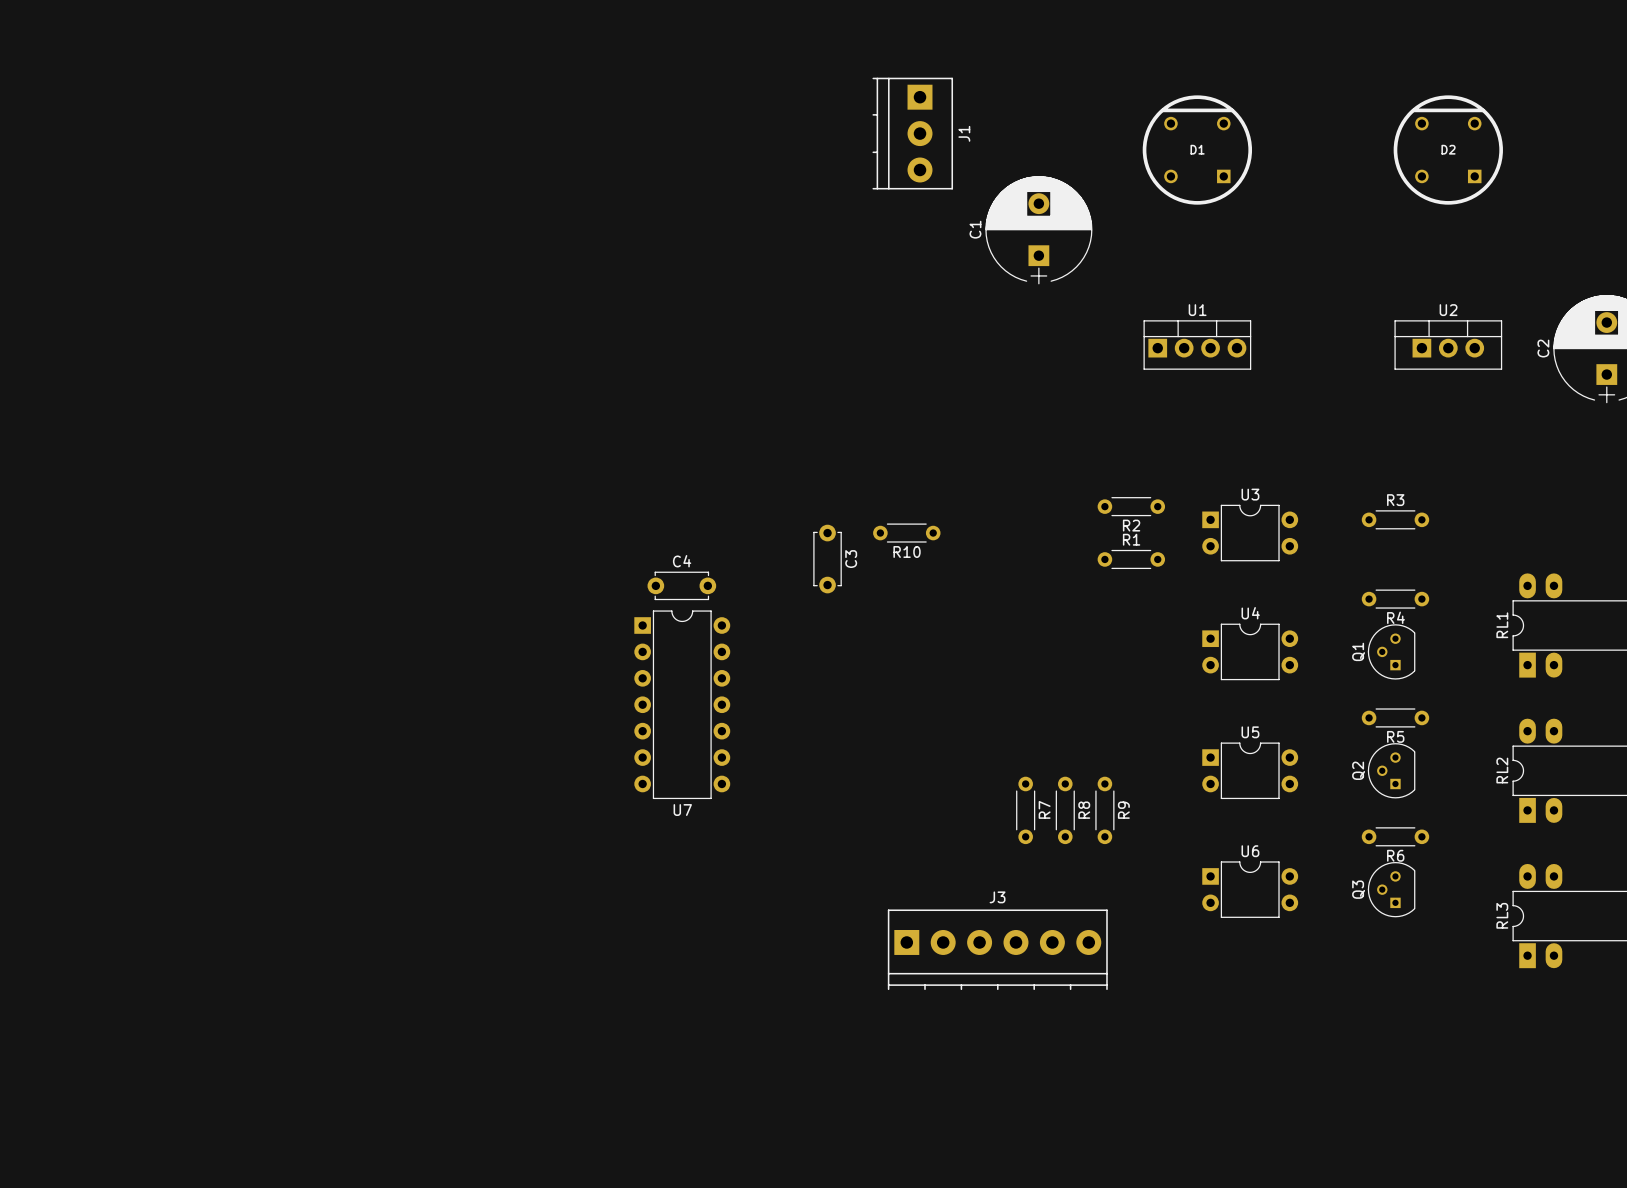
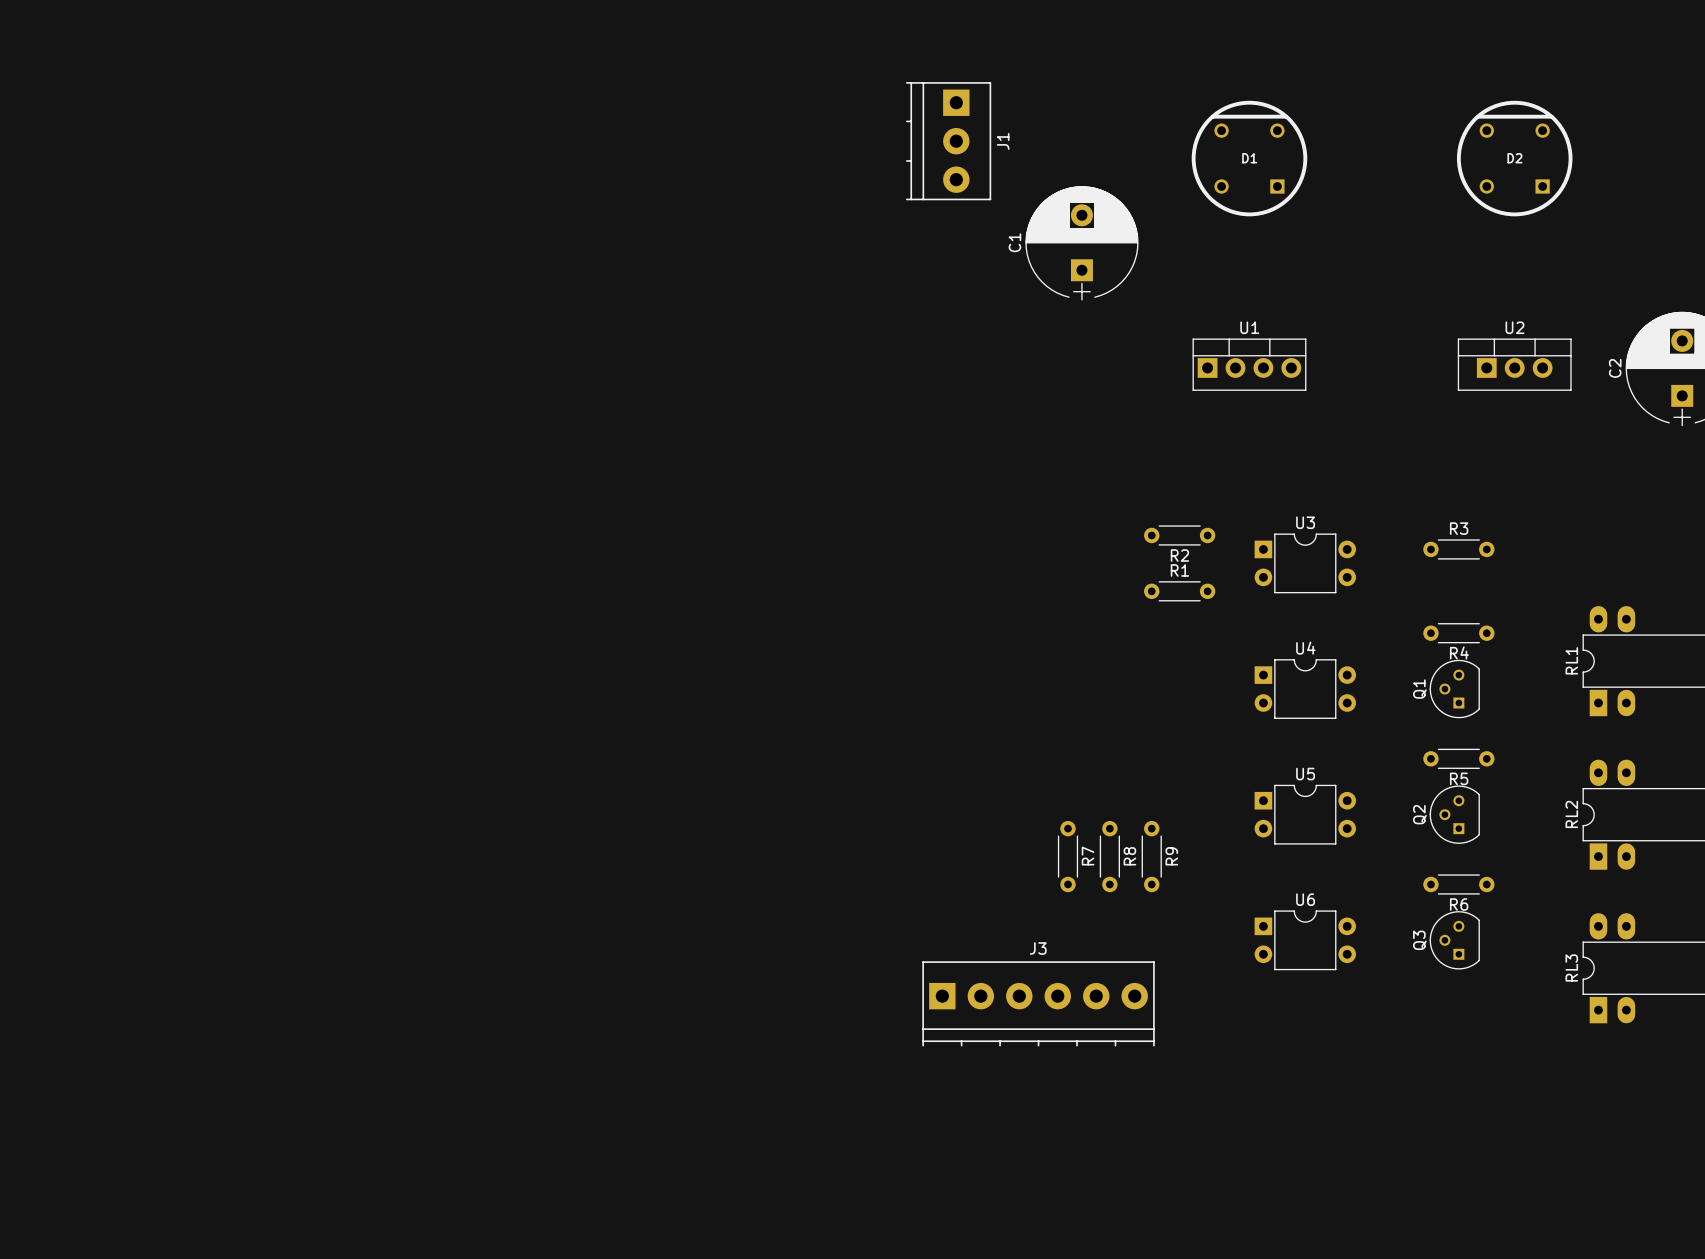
R10: (906, 533) -> none
C3: (827, 559) -> none
C4: (681, 585) -> none
U7: (682, 704) -> none

